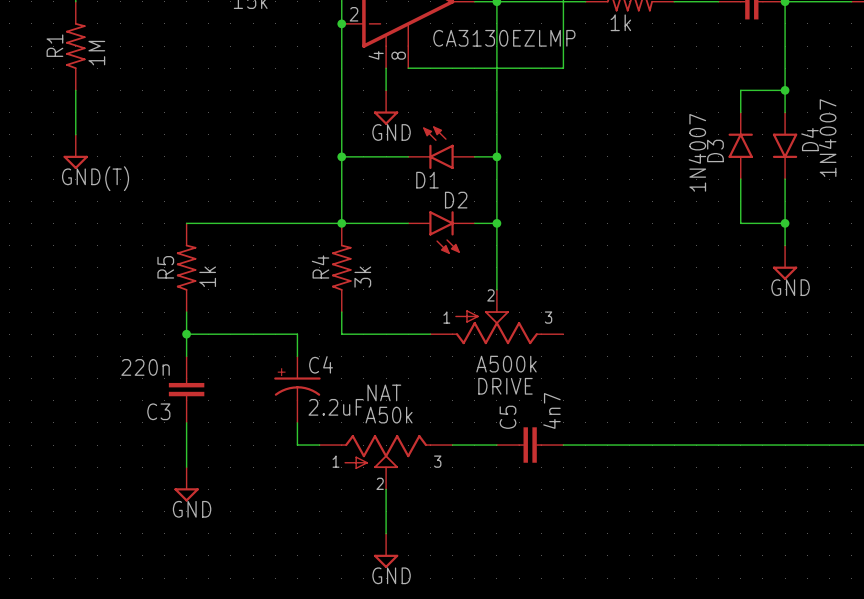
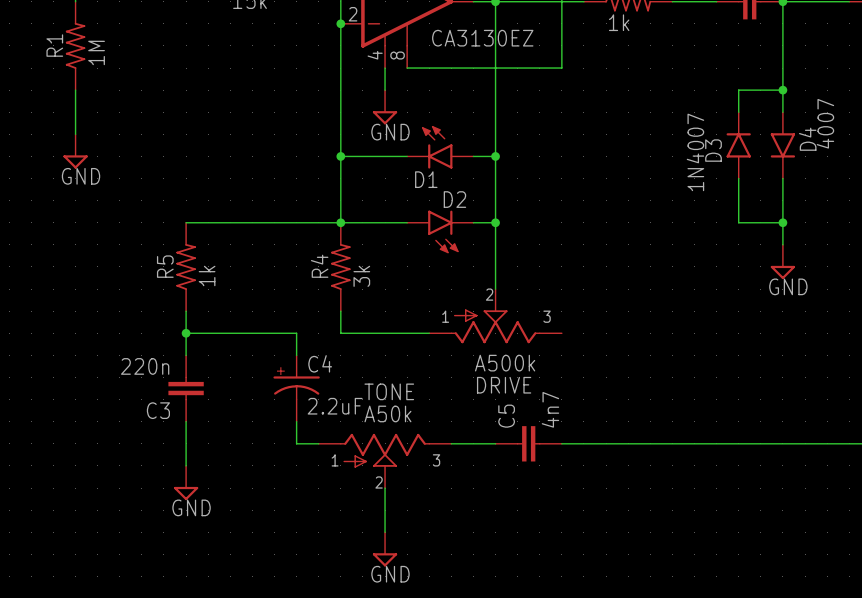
part value: CA3130EZLMP (504, 38) -> CA3130EZ (482, 38)
D4 value: 1N4007 (827, 138) -> 4007 (825, 123)
part: GND(T) (75, 151) -> none
NAT name: NAT (384, 392) -> TONE (389, 391)

